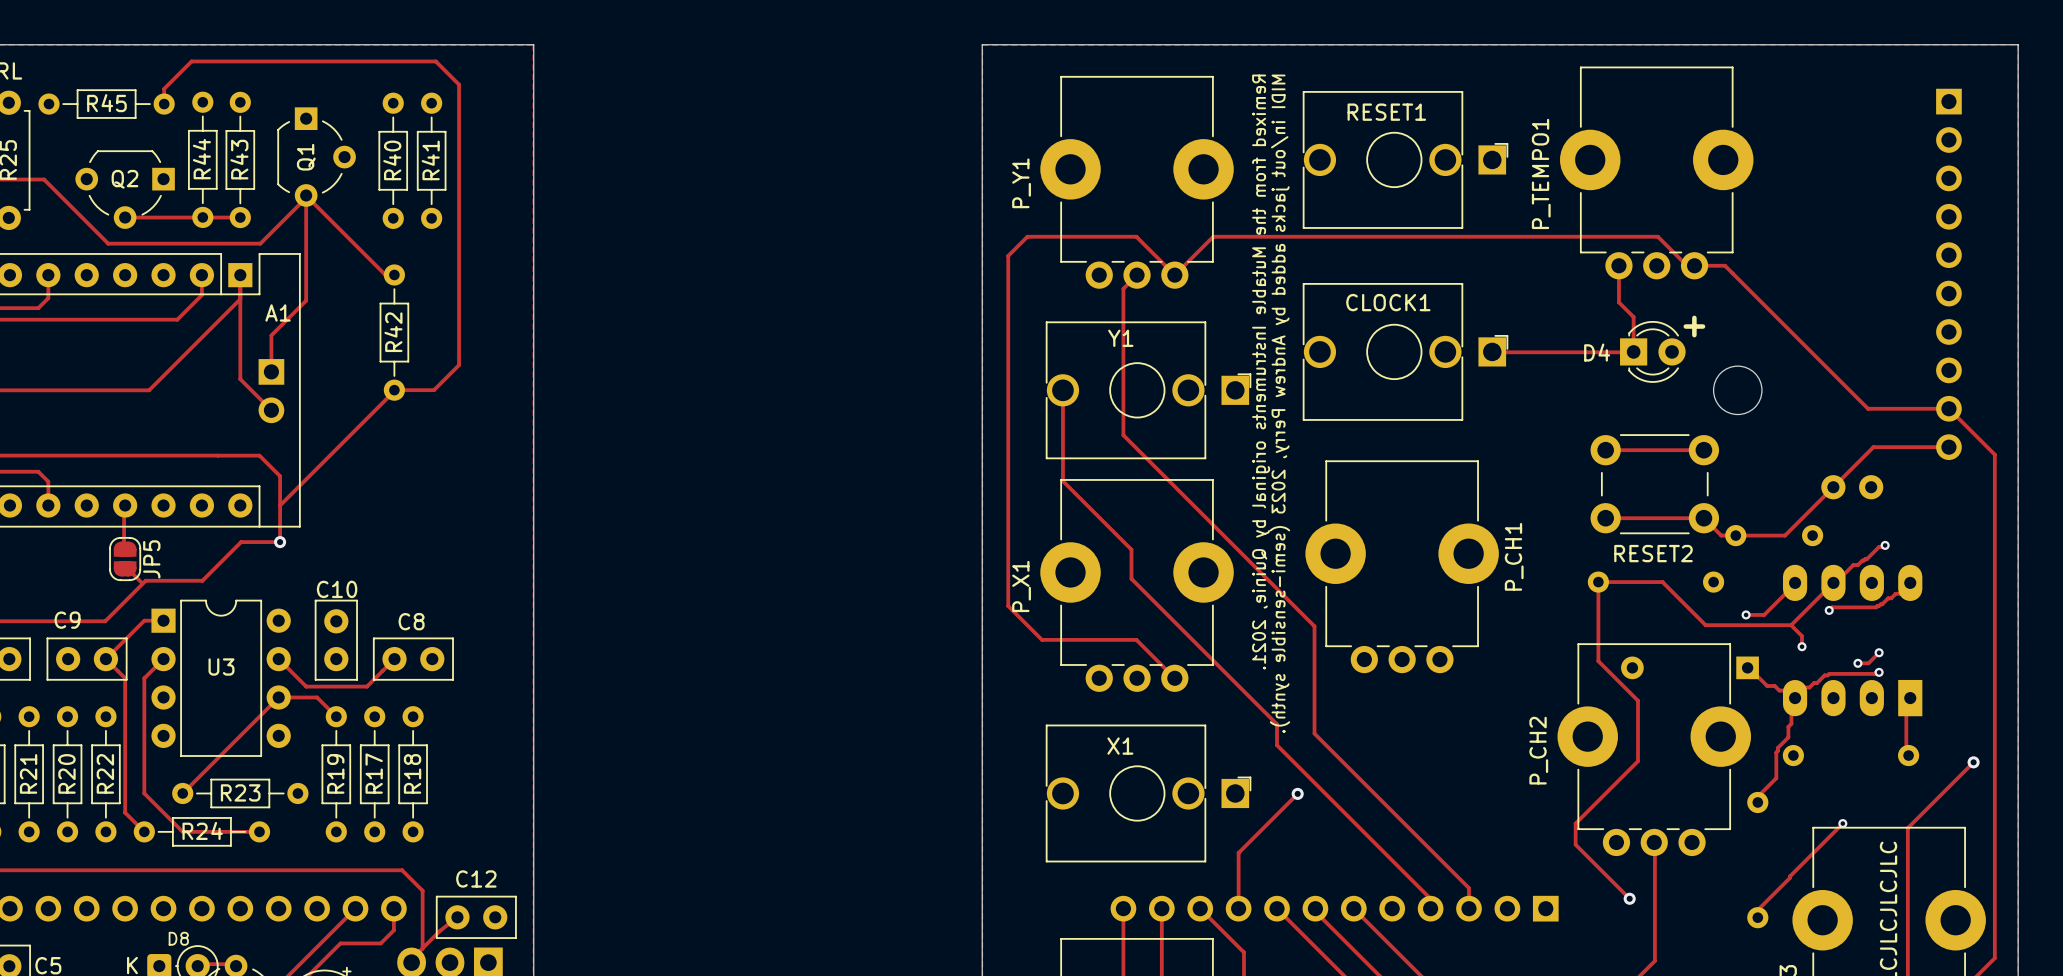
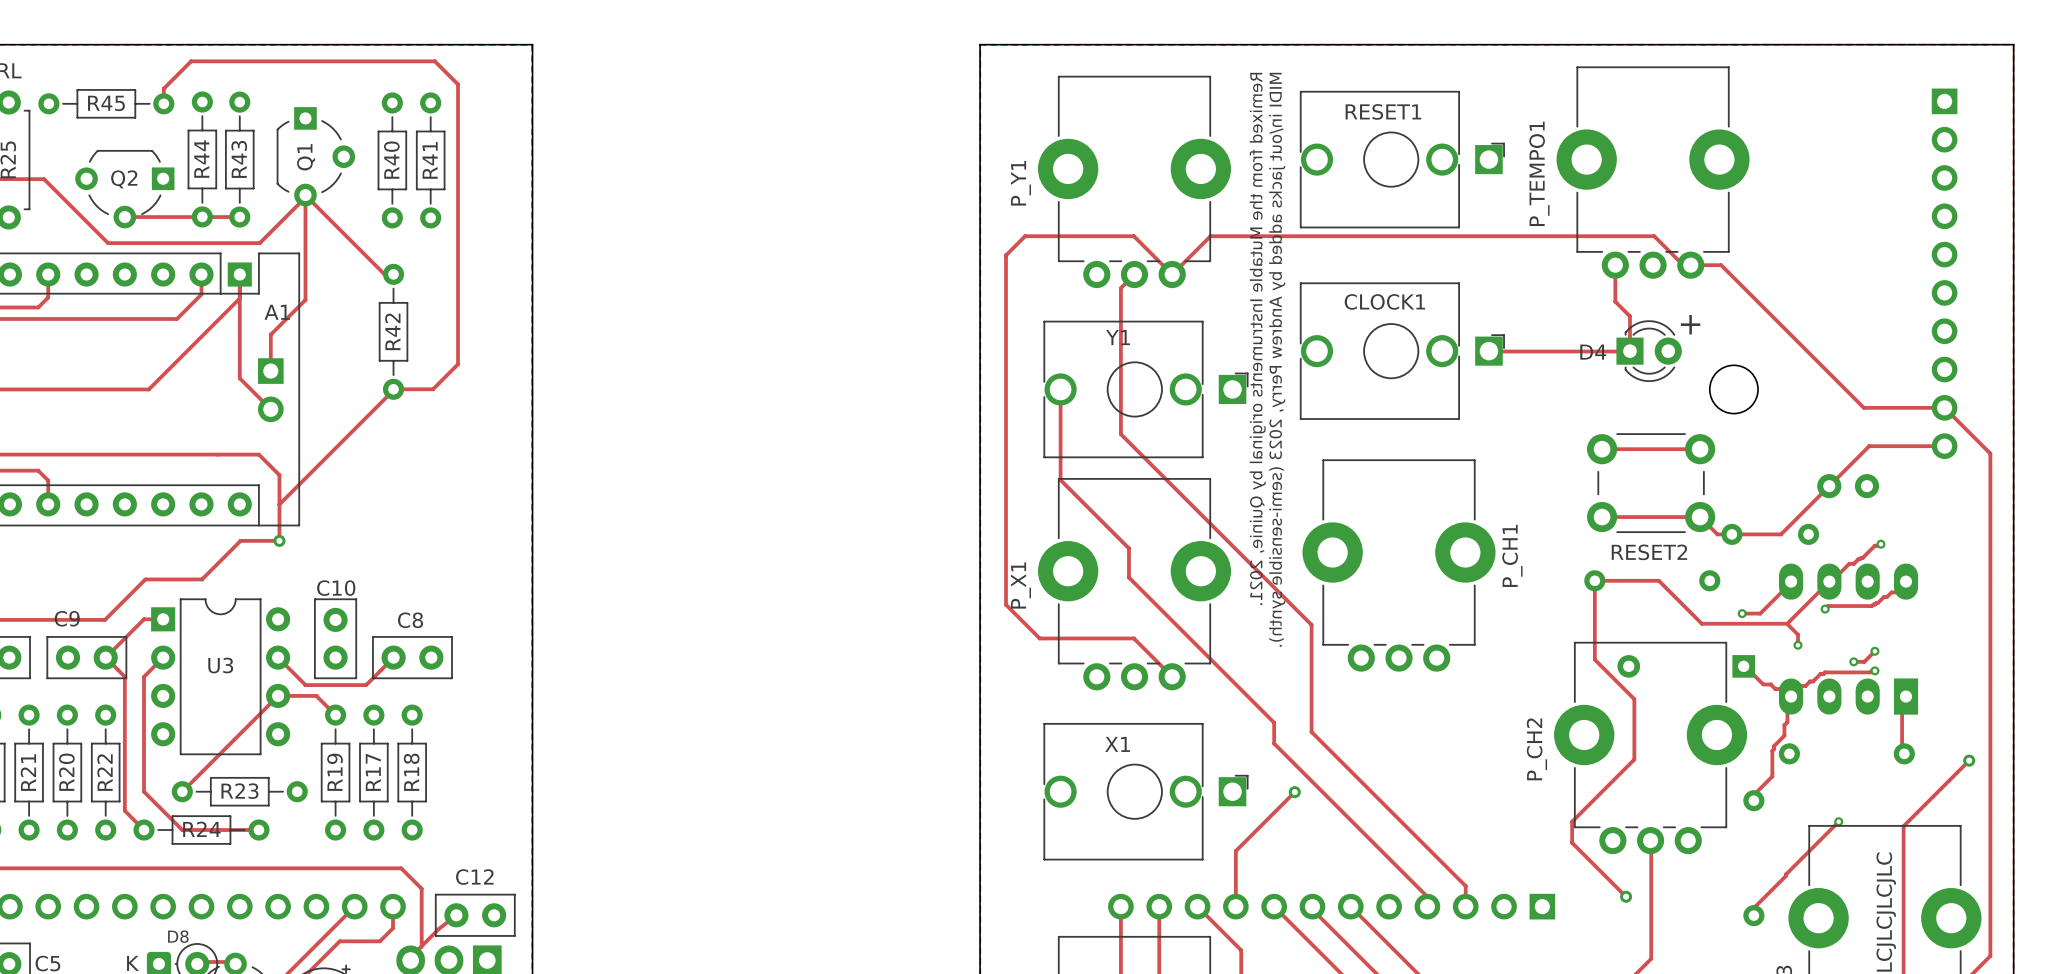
track: (124, 516) (124, 542) -> none
JP5: (125, 559) -> none
track: (133, 574) (142, 583) -> none

